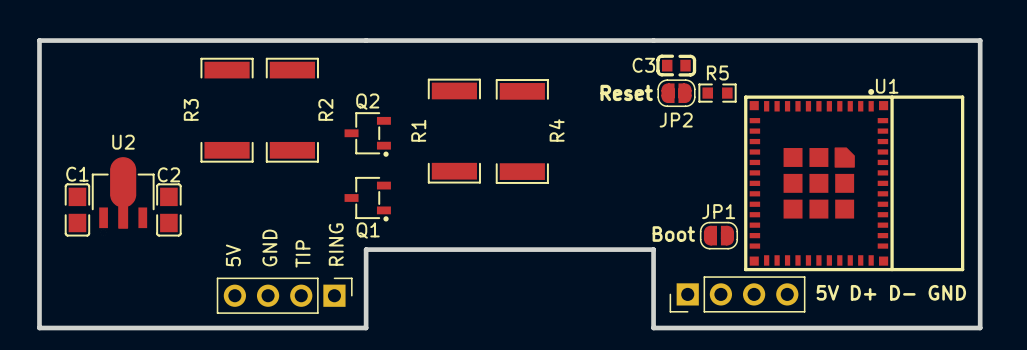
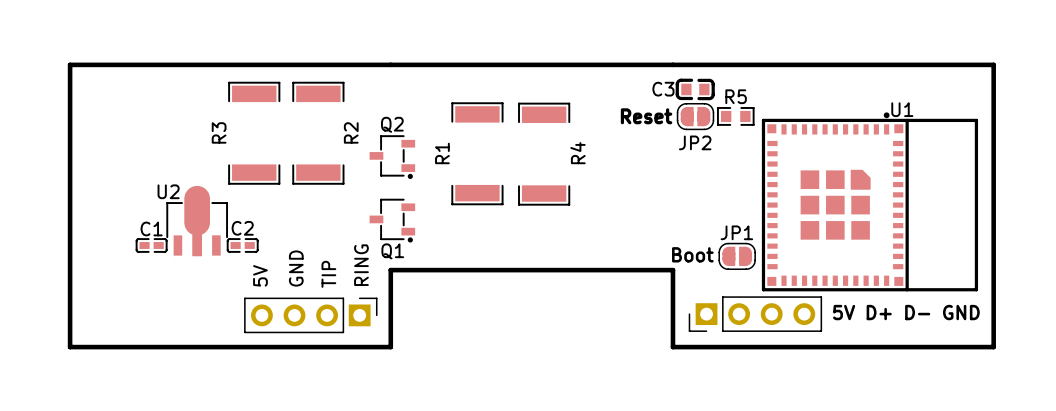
U2 name position: U2 (123, 142) -> U2 (168, 191)
C1 footprint: [64, 183, 91, 237] -> [135, 238, 168, 253]
C2 footprint: [156, 183, 182, 237] -> [226, 238, 259, 253]
U2 position: (123, 196) -> (197, 224)

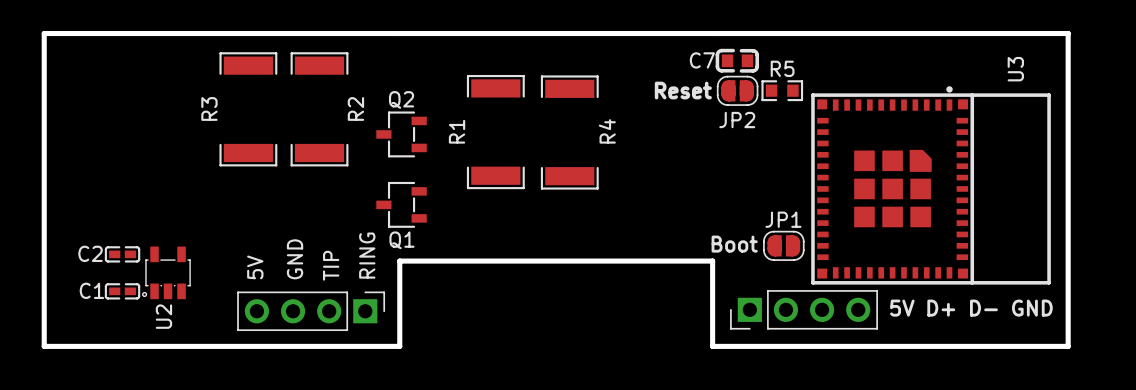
C3 name: C3 (663, 89) -> C7 (702, 60)
U1 name: U1 (902, 109) -> U3 (1015, 69)
Q2 footprint: [369, 135, 416, 179] -> [376, 111, 427, 158]
U2 footprint: [166, 185, 229, 264] -> [142, 246, 191, 300]
U2 name position: U2 (168, 191) -> U2 (163, 316)
Q1 footprint: [369, 198, 416, 243] -> [376, 181, 427, 228]
C1 name position: C1 (151, 228) -> C1 (91, 290)
C2 name position: C2 (242, 228) -> C2 (90, 253)
C1 position: (151, 245) -> (122, 291)
C2 position: (242, 245) -> (122, 254)

